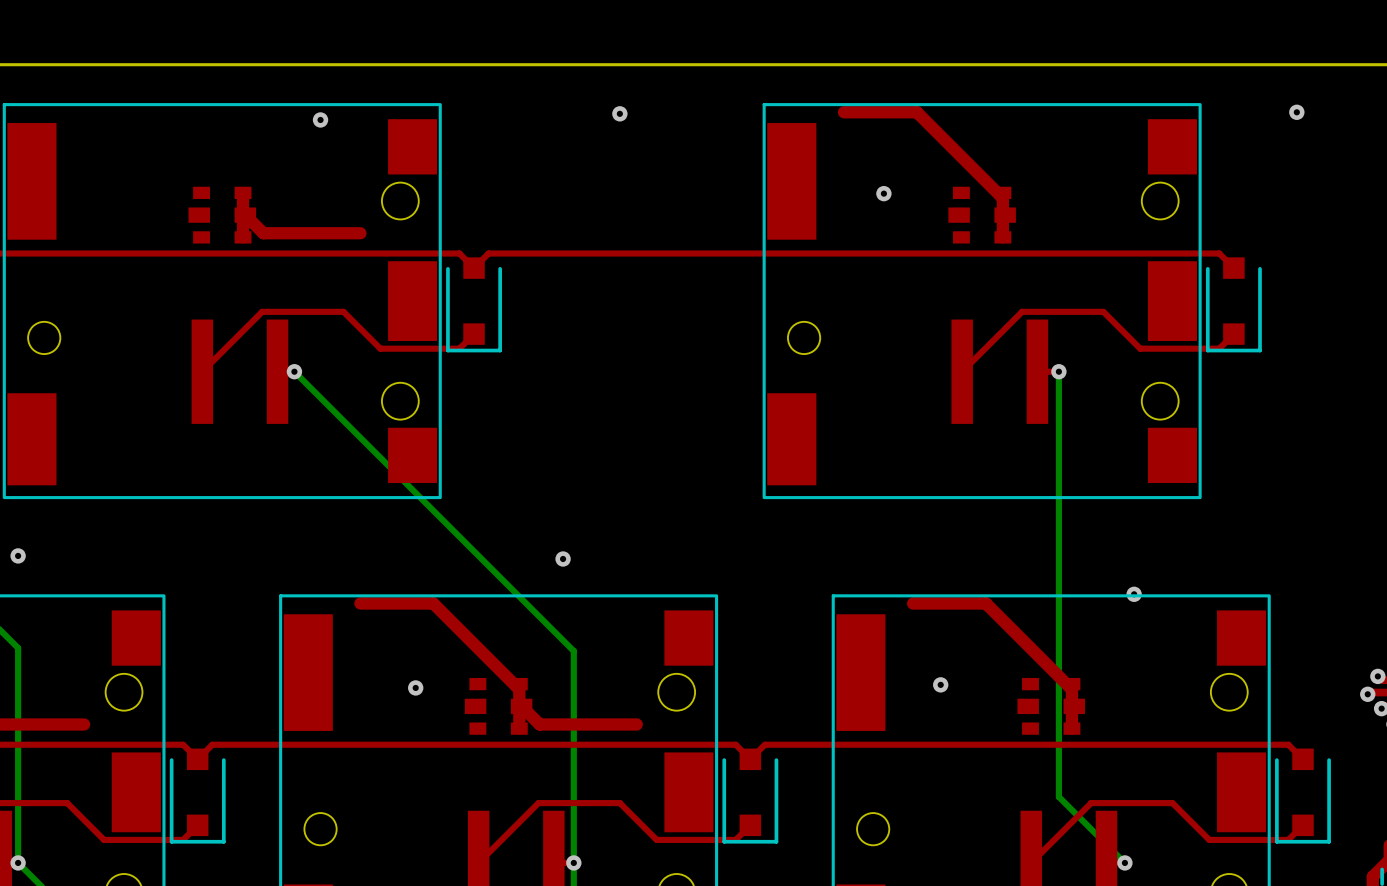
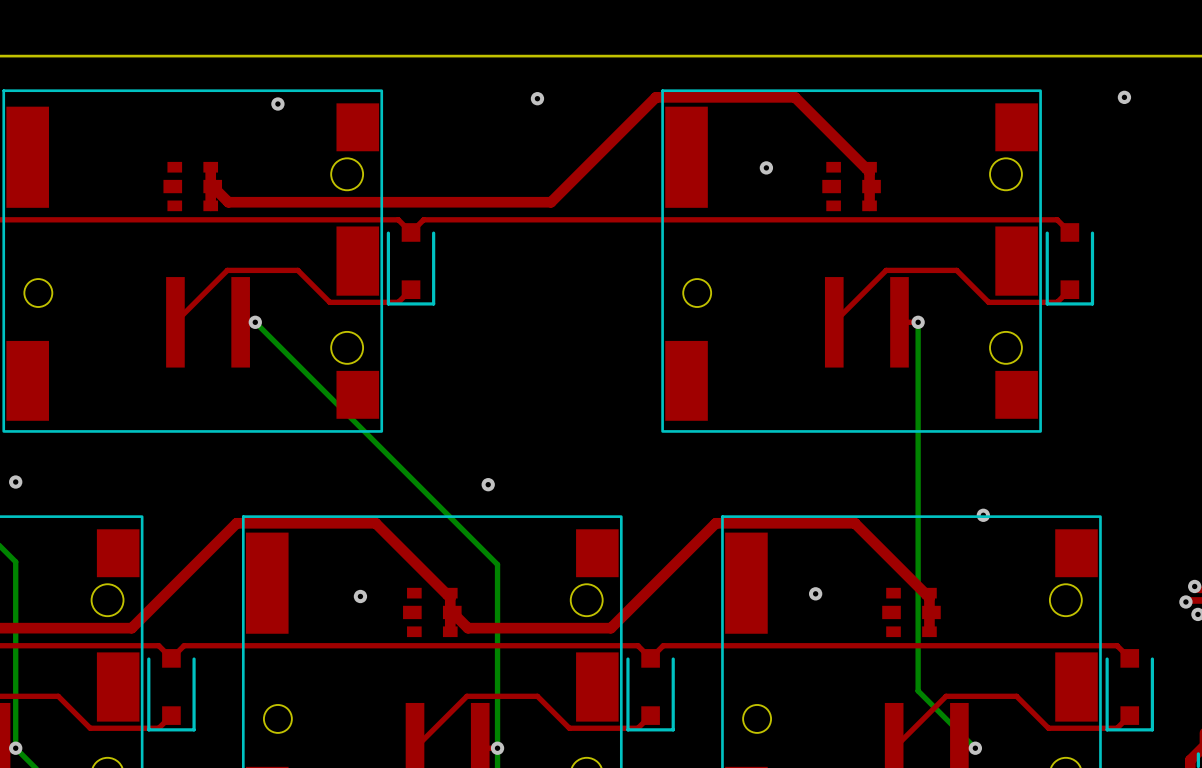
top track: none -> (731, 97) (655, 97) (551, 202) (312, 202)
top track: none -> (312, 523) (236, 523) (131, 628) (72, 628)
top track: none -> (791, 523) (715, 523) (610, 628) (552, 628)

